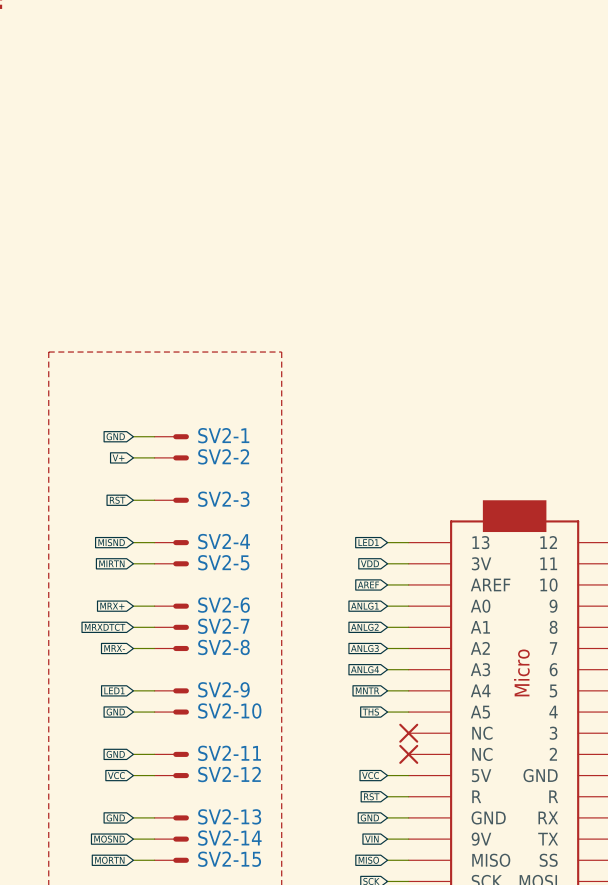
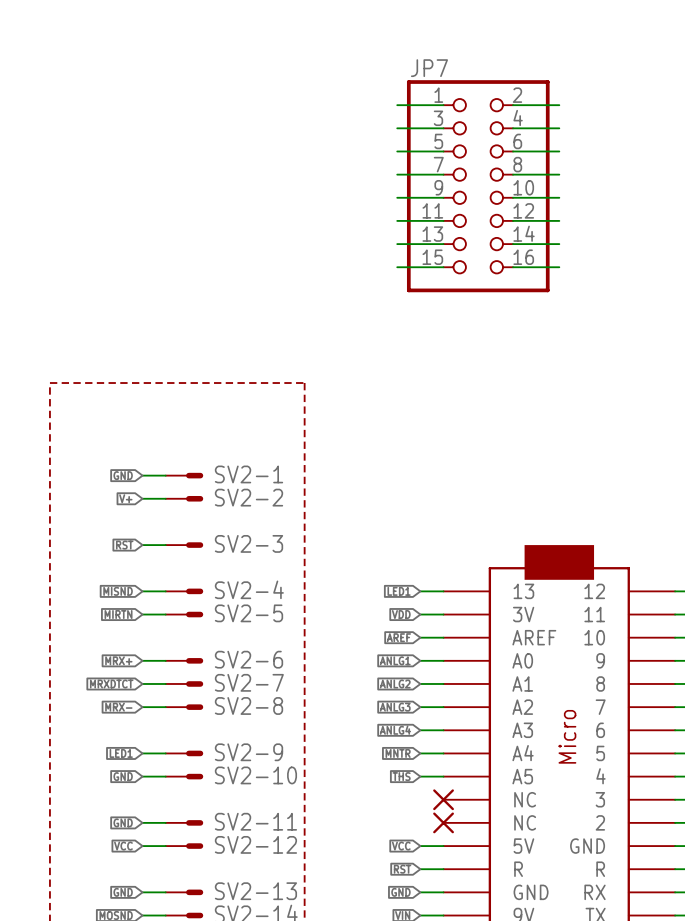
wire: none -> (397, 105) (443, 105)
wire: none -> (513, 105) (559, 105)
wire: none -> (397, 128) (443, 128)
wire: none -> (513, 128) (559, 128)
wire: none -> (397, 151) (443, 151)
wire: none -> (513, 151) (559, 151)
wire: none -> (397, 174) (443, 174)
wire: none -> (513, 174) (559, 174)
JP7: none -> (478, 186)
wire: none -> (397, 197) (443, 197)
wire: none -> (513, 197) (559, 197)
wire: none -> (397, 220) (443, 220)
wire: none -> (513, 220) (559, 220)
wire: none -> (397, 244) (443, 244)
wire: none -> (513, 244) (559, 244)
wire: none -> (397, 267) (443, 267)
wire: none -> (513, 267) (559, 267)

